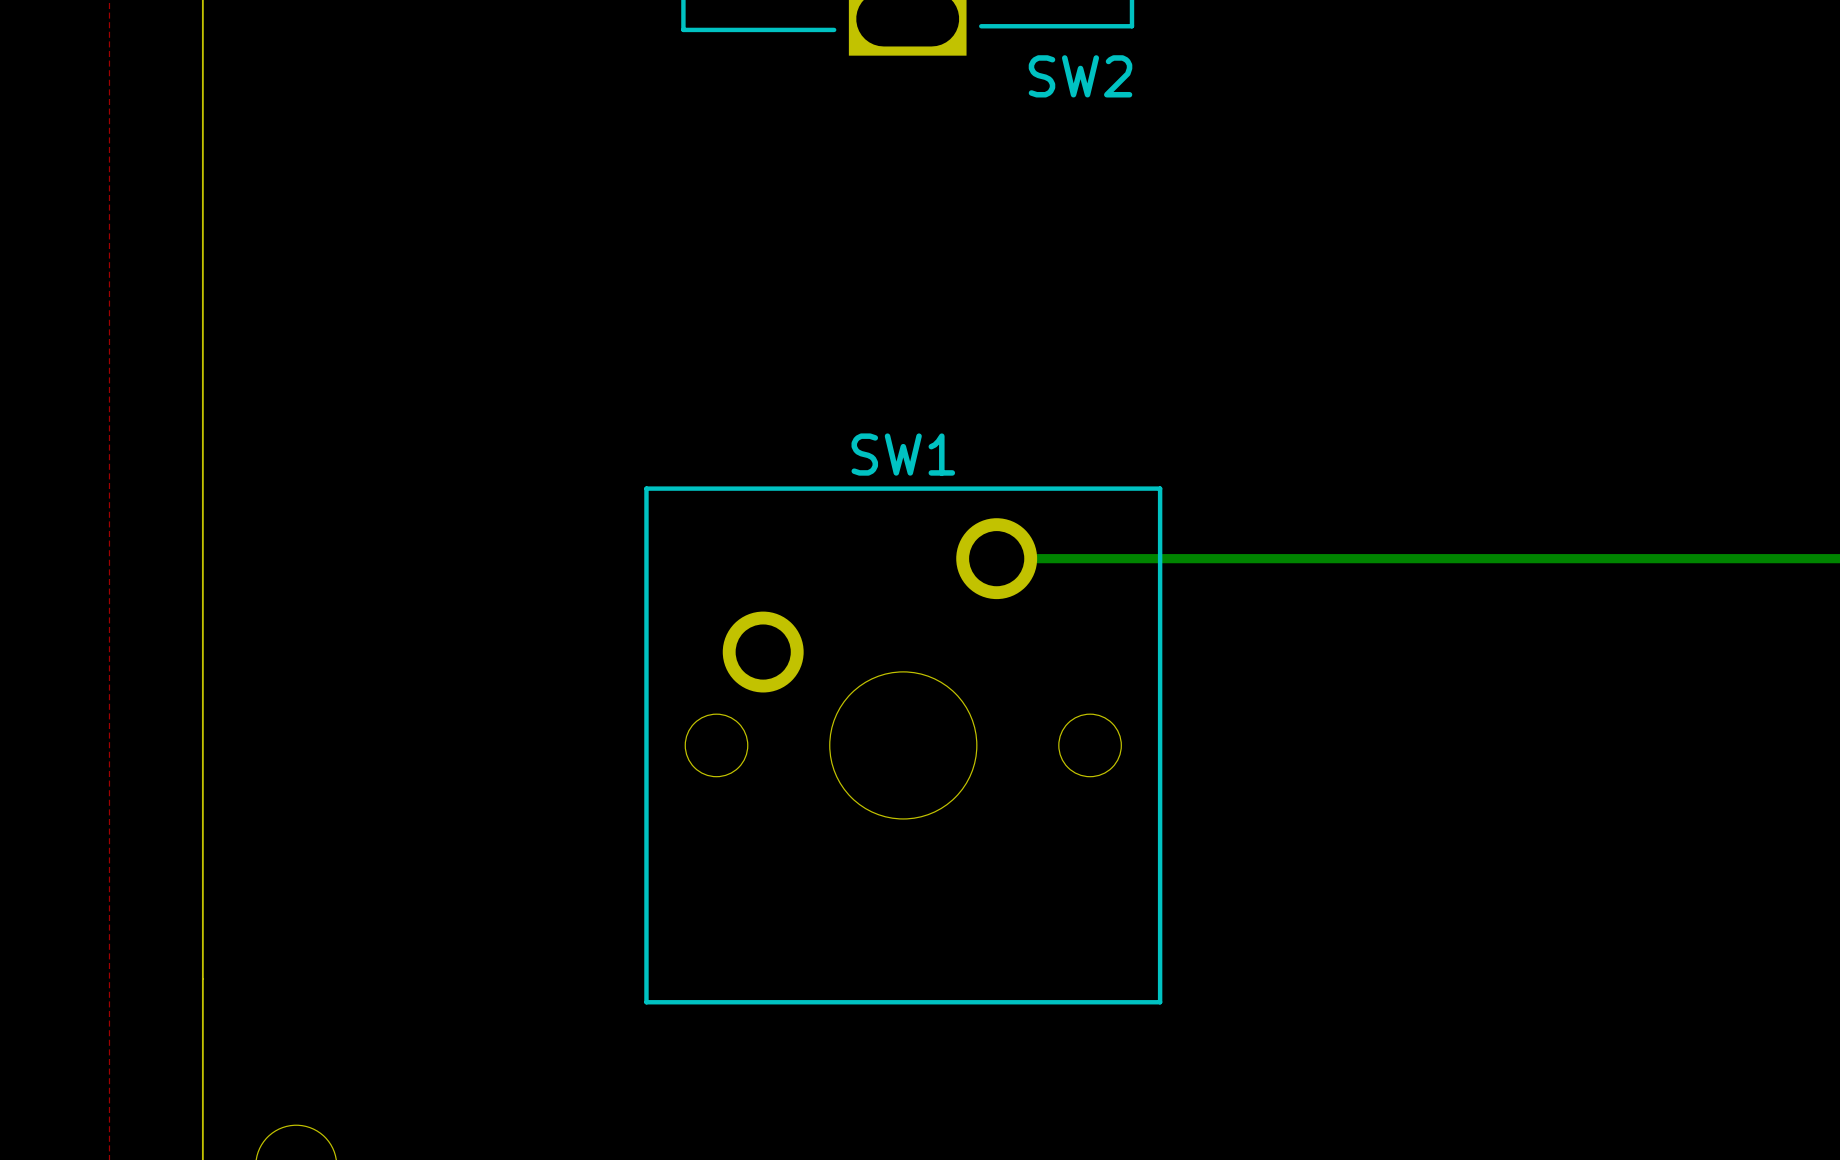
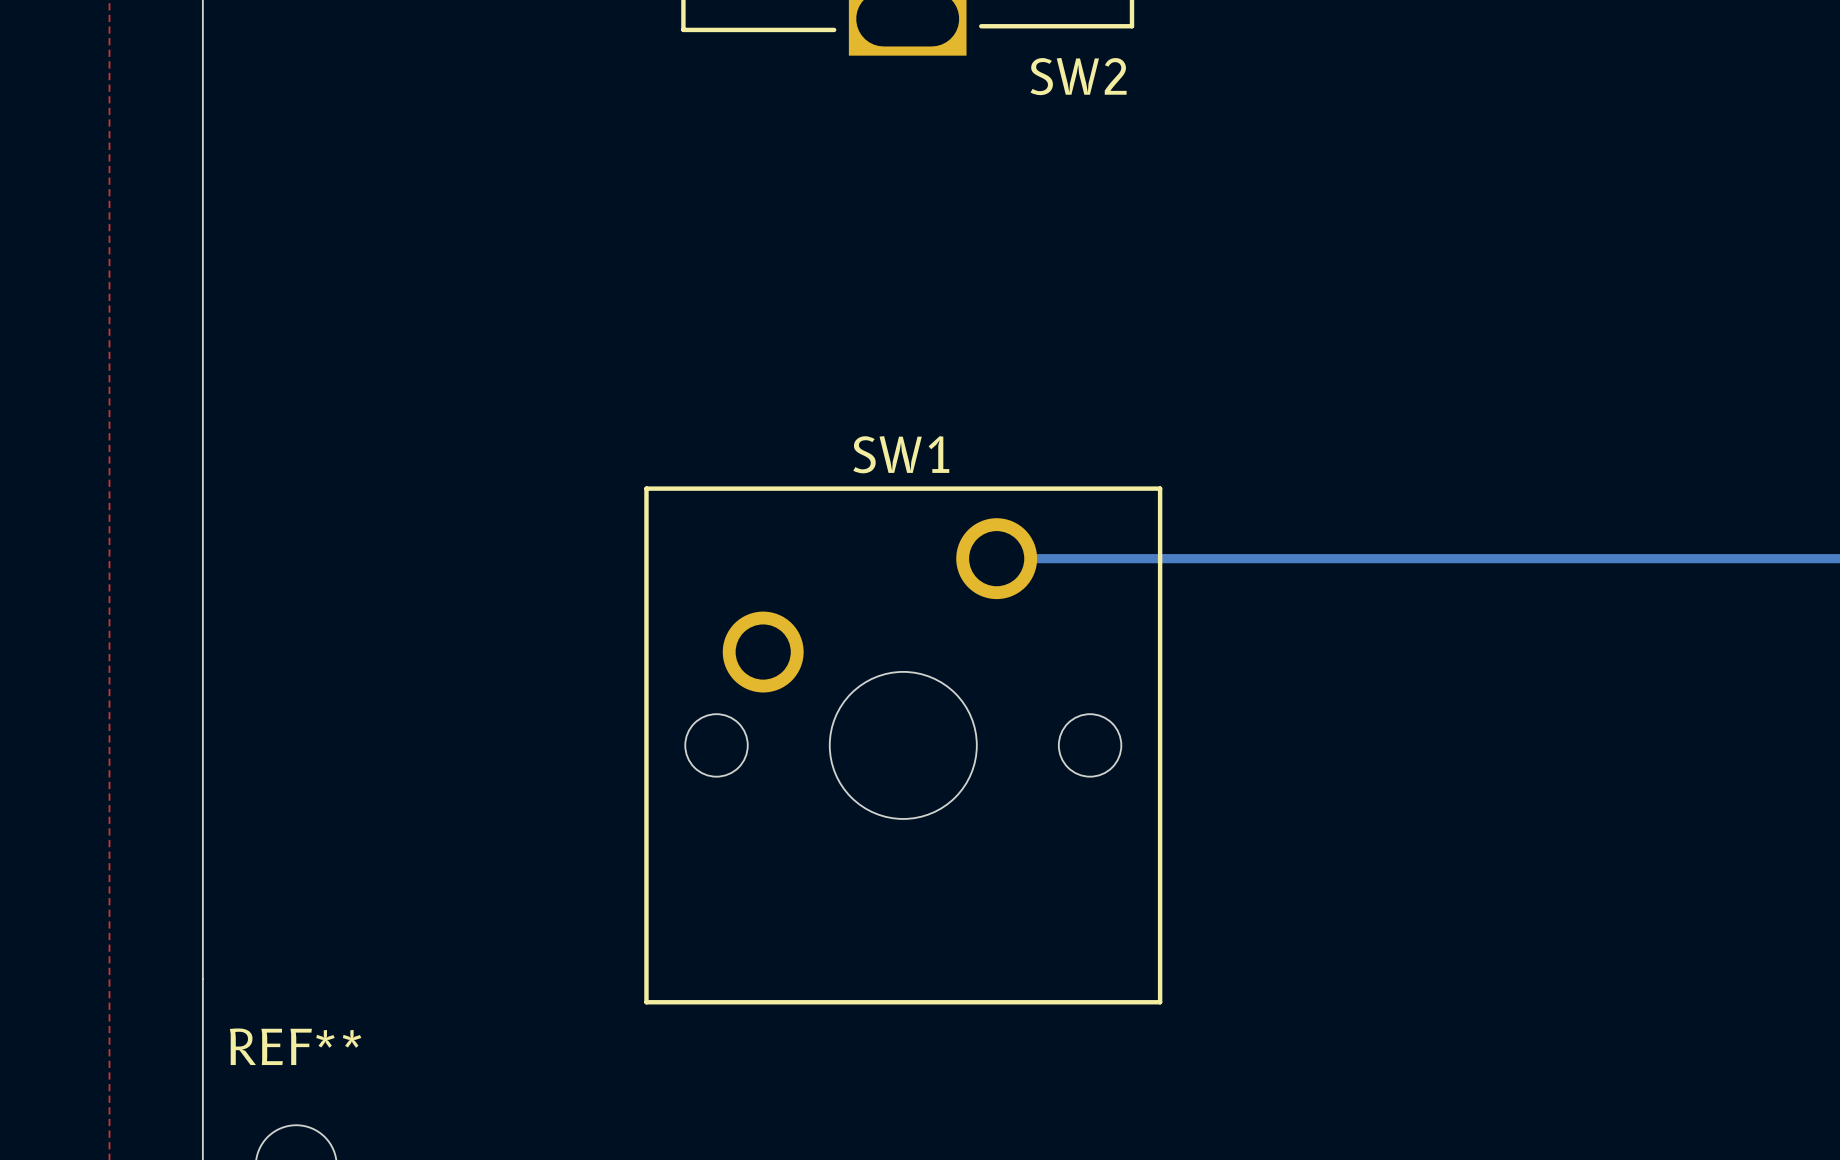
REF** name: none -> REF** (295, 1046)

